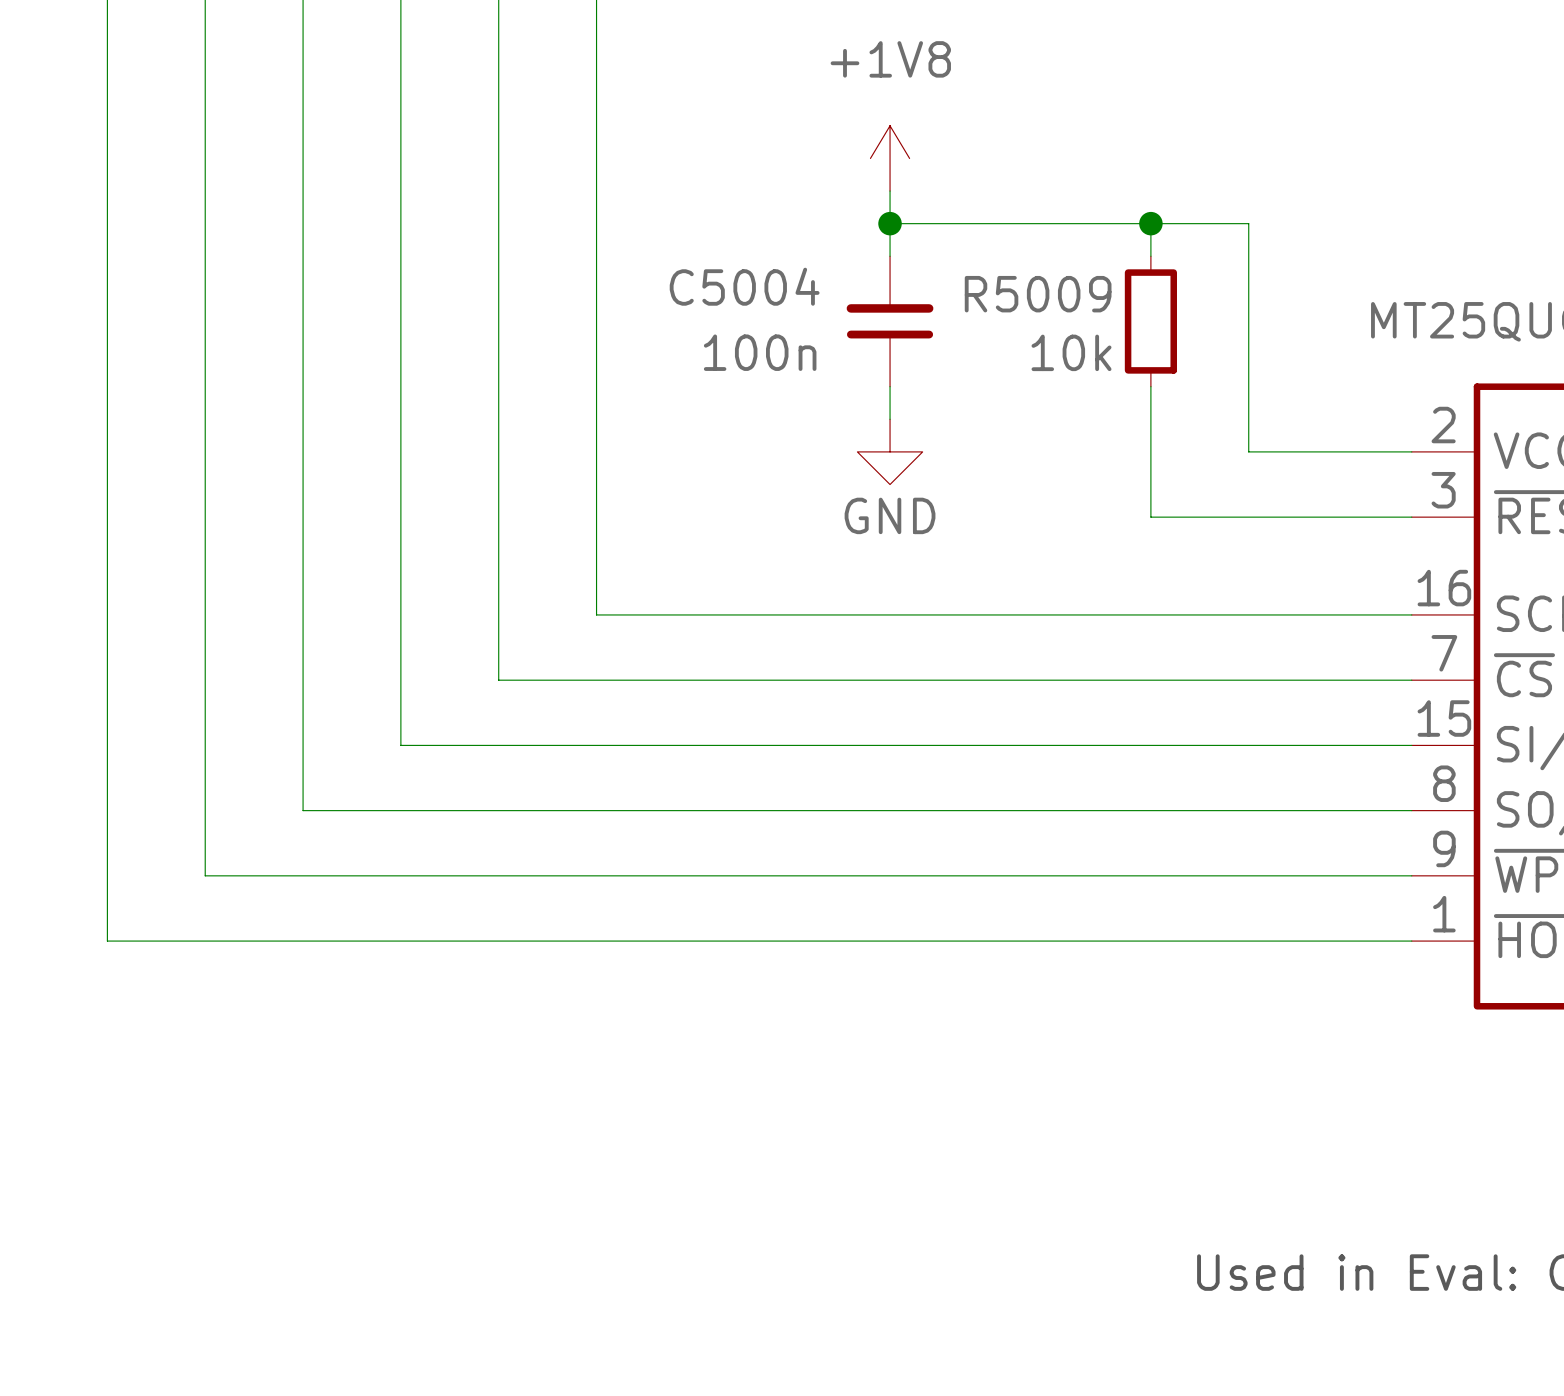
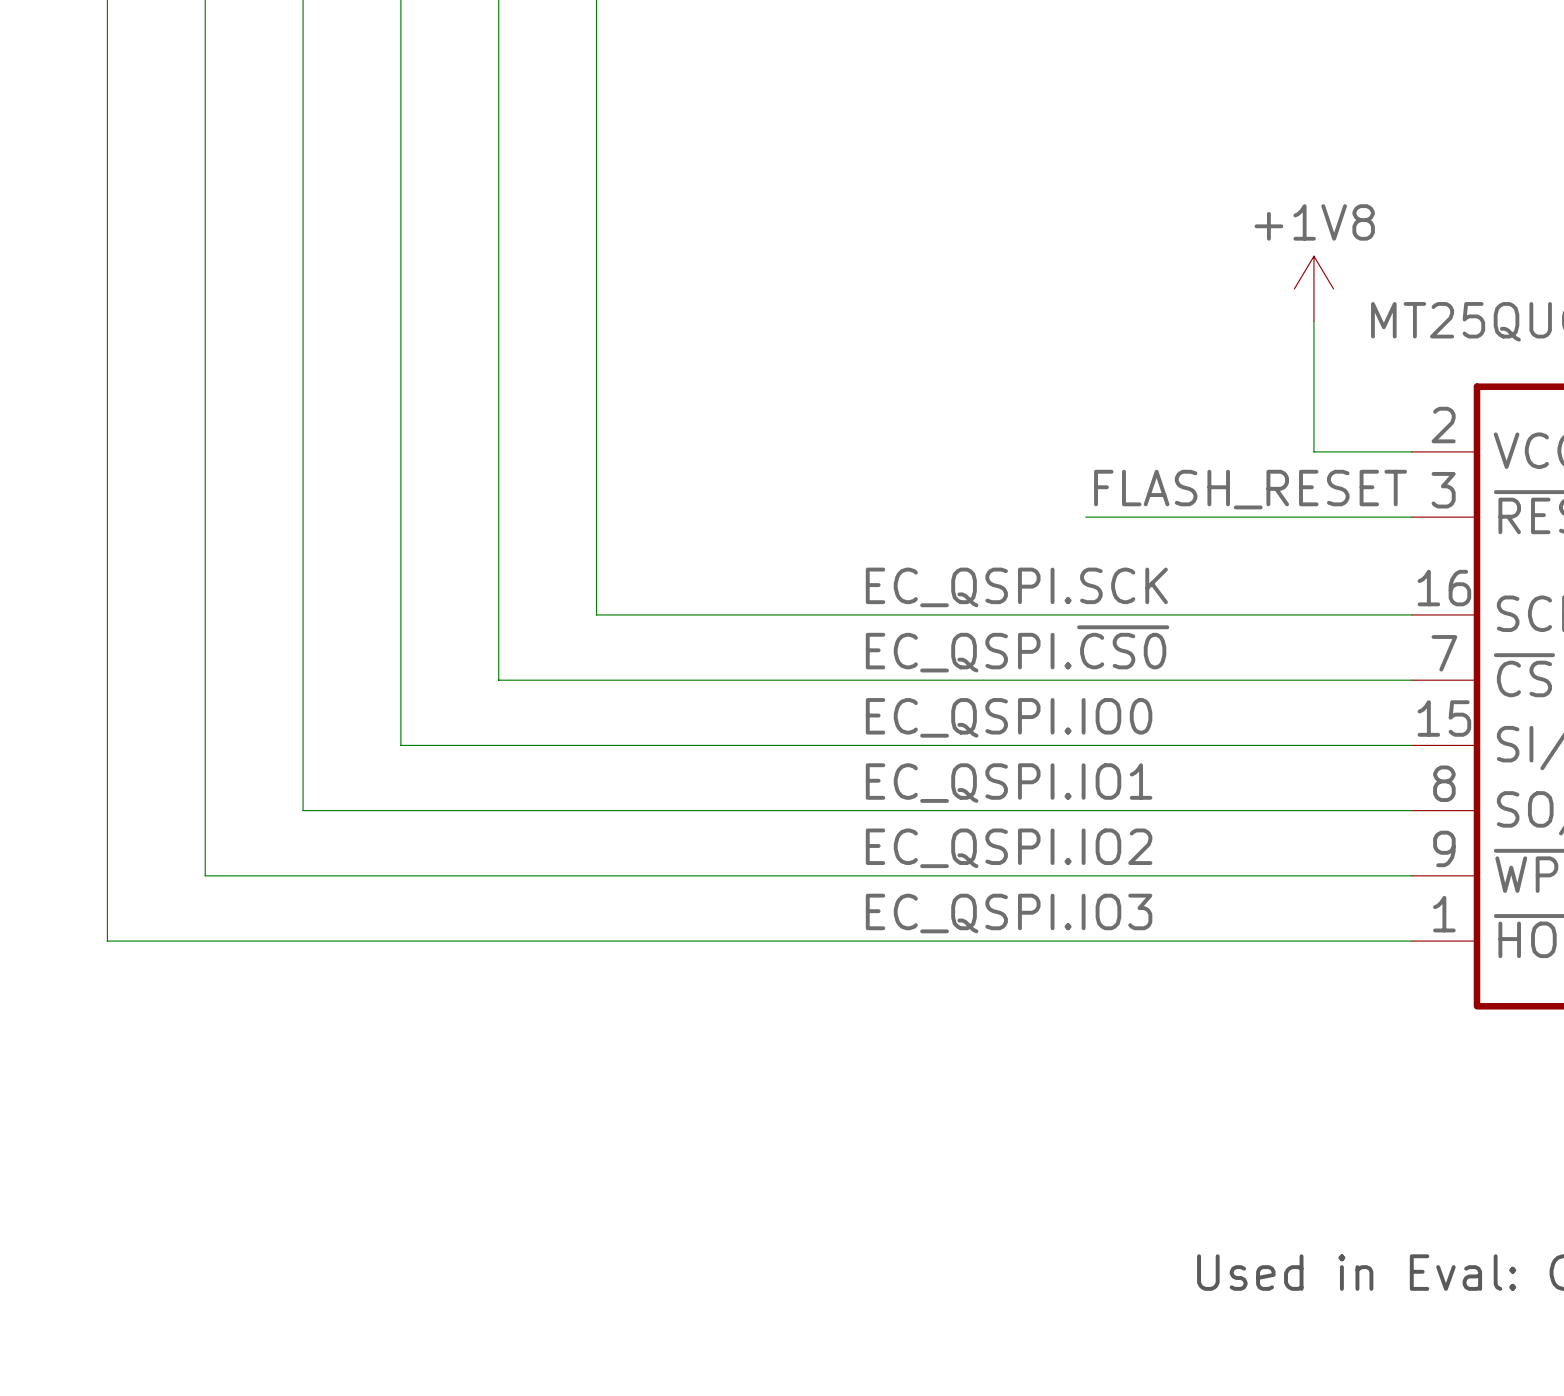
power symbol text position: +1V8 (890, 59) -> +1V8 (1314, 222)
power symbol position: +1V8 (890, 158) -> +1V8 (1313, 288)
wire: (890, 191) (890, 256) -> none
wire: (890, 223) (1248, 223) (1248, 451) (1313, 451) -> (1313, 321) (1313, 451)
junction: (890, 223) -> none
wire: (1150, 223) (1150, 256) -> none
junction: (1150, 223) -> none
C5004: (890, 321) -> none
R5009: (1150, 321) -> none
wire: (890, 386) (890, 419) -> none
wire: (1150, 386) (1150, 517) -> (1085, 517) (1150, 517)
power symbol: GND (890, 451) -> none
label: none -> FLASH_RESET (1250, 489)
label: none -> EC_QSPI.SCK (1016, 587)
label: none -> EC_QSPI.~{CS0} (1017, 648)
label: none -> EC_QSPI.IO0 (1009, 717)
label: none -> EC_QSPI.IO1 (1009, 783)
label: none -> EC_QSPI.IO2 (1009, 848)
label: none -> EC_QSPI.IO3 (1009, 913)

